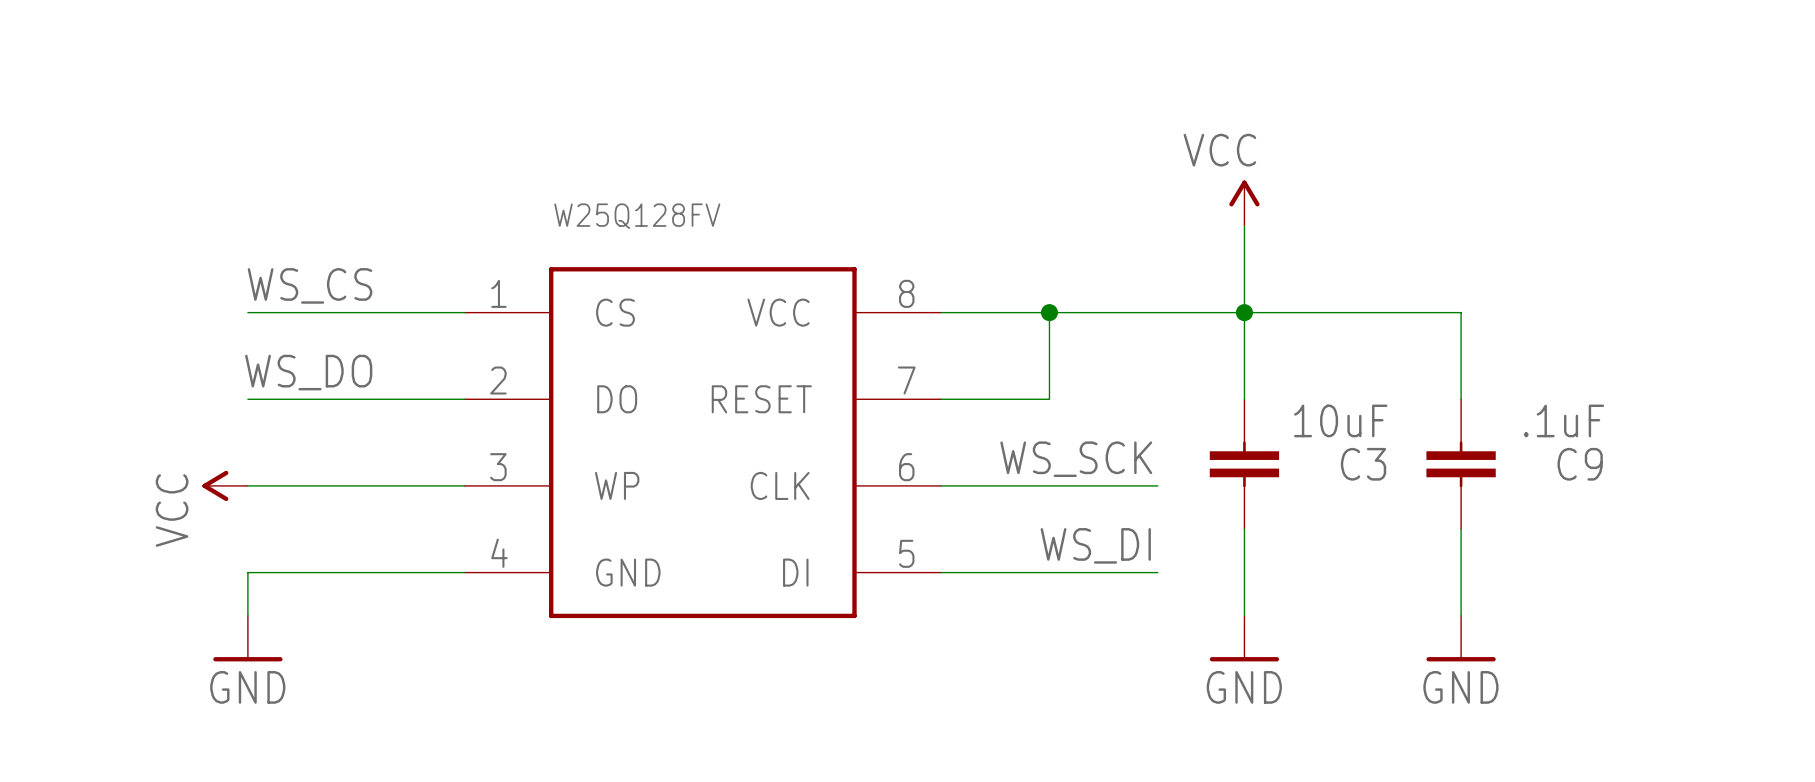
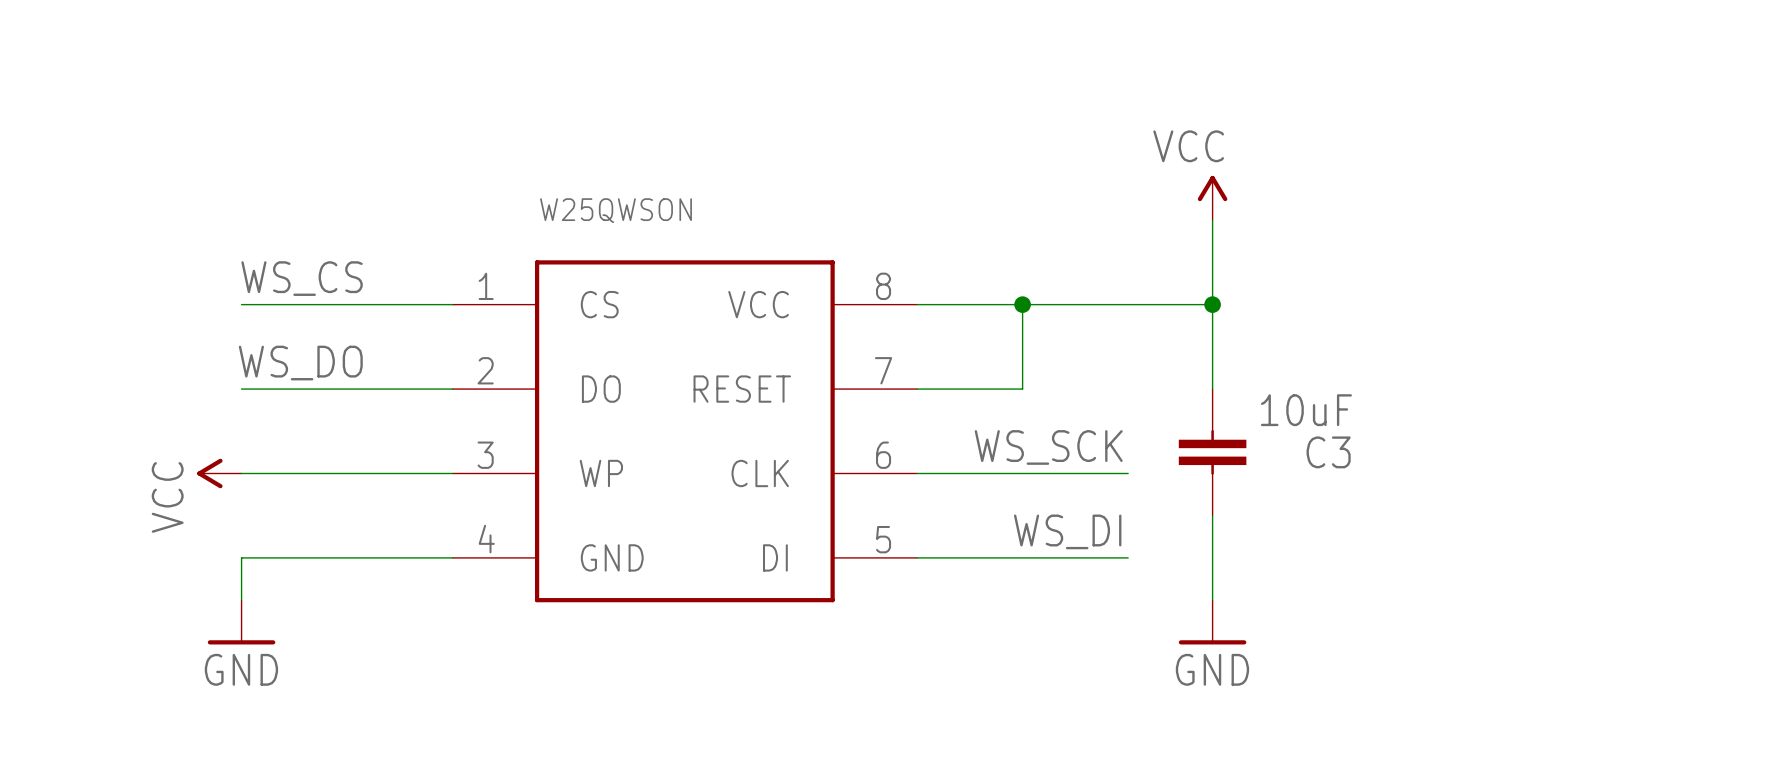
W25Q128FV name: W25Q128FV (637, 216) -> W25QWSON (616, 210)
wire: (1244, 312) (1461, 312) (1461, 399) -> none
C9: .1uF (1461, 464) -> none
wire: (1461, 529) (1461, 615) -> none
power symbol: GND (1461, 638) -> none

